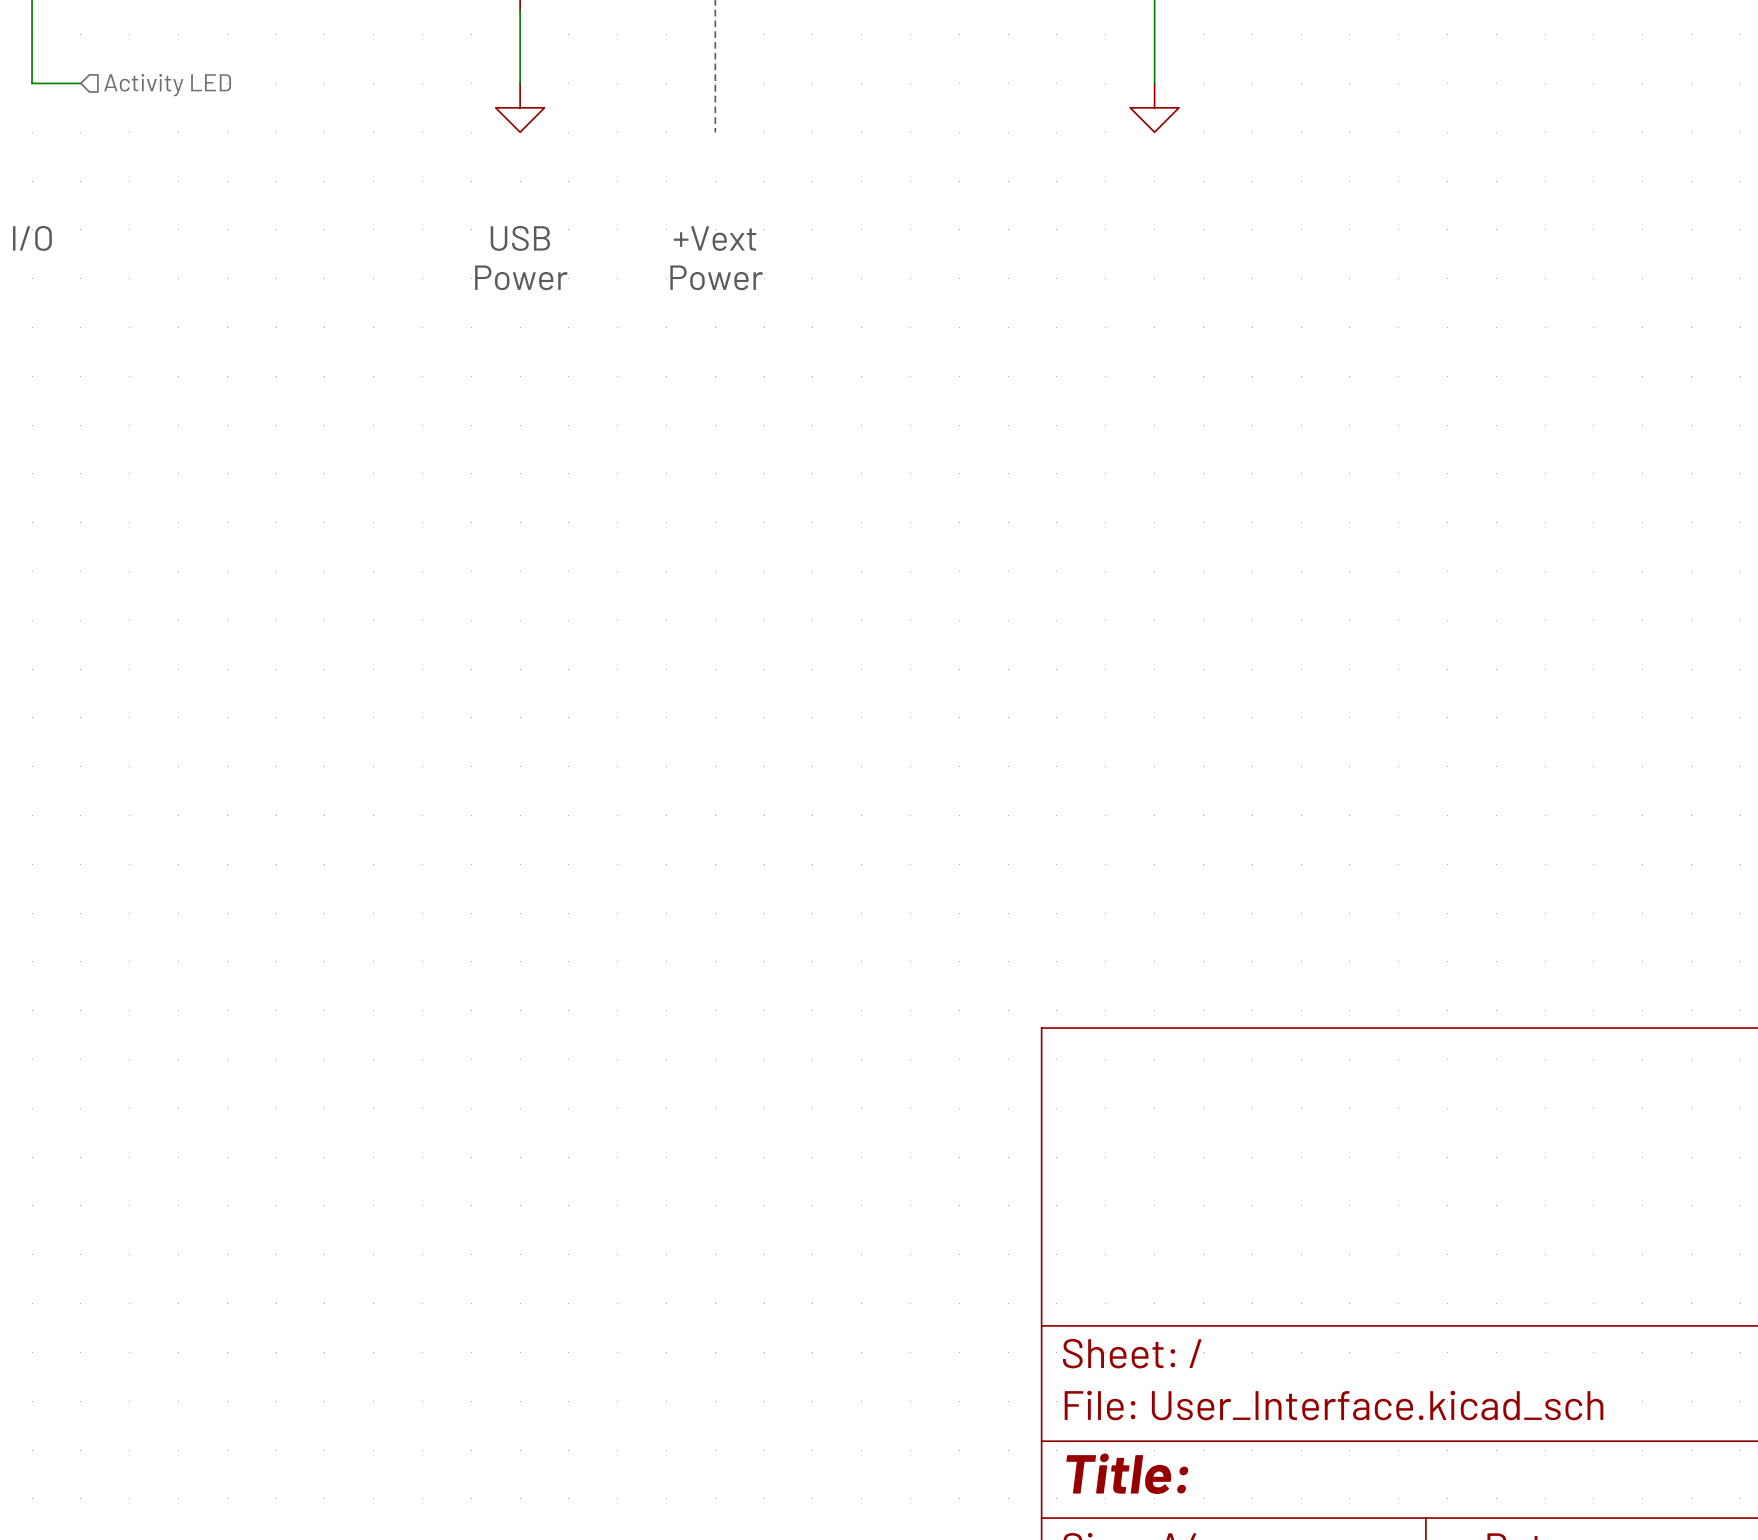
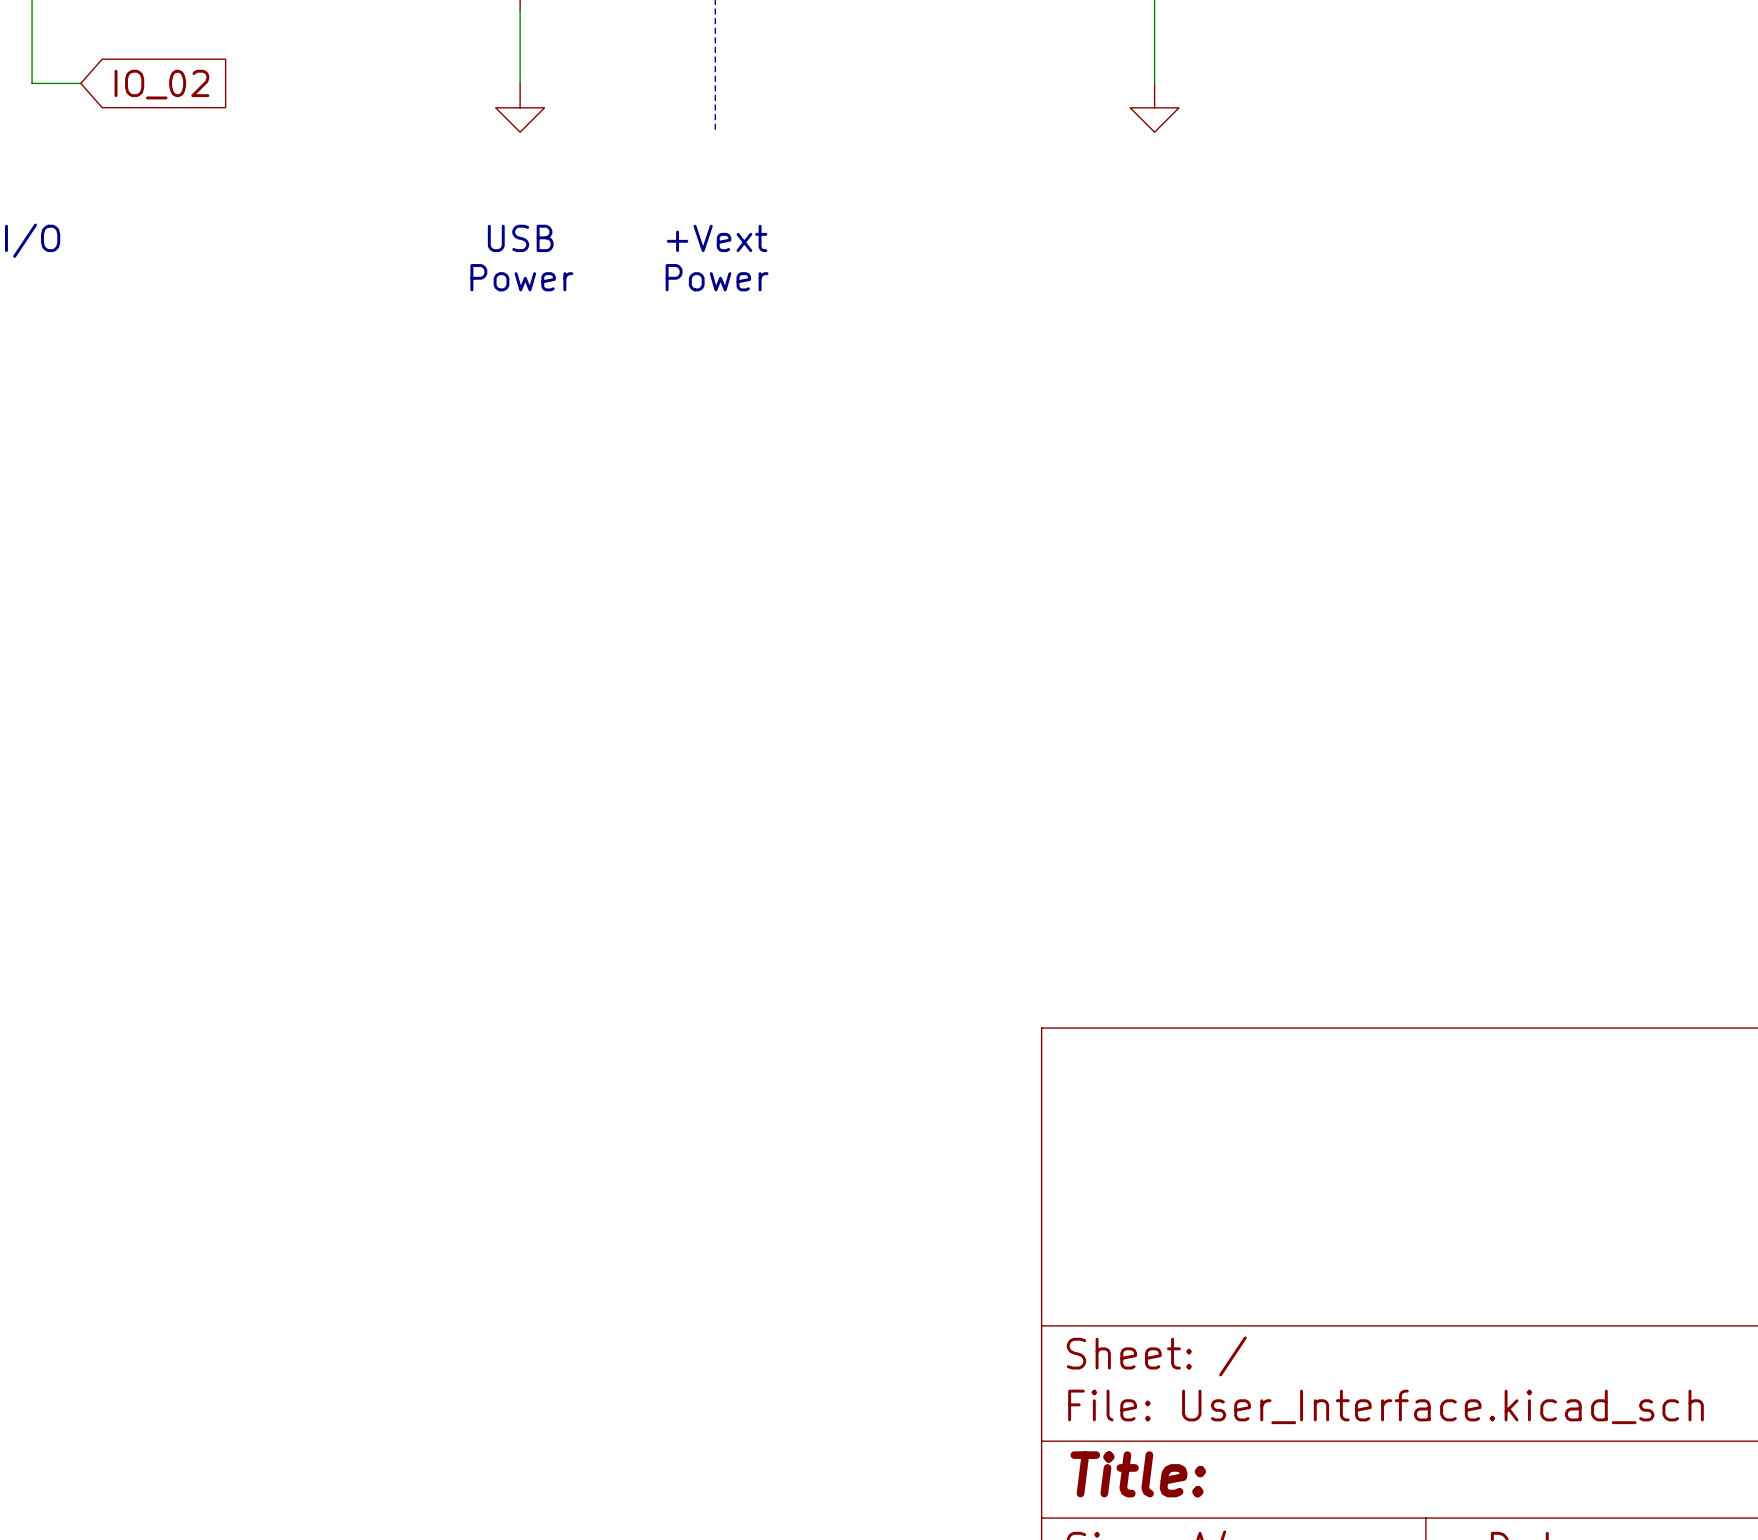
global label: none -> IO_02 (161, 84)
hierarchical label: Activity LED (167, 85) -> none

